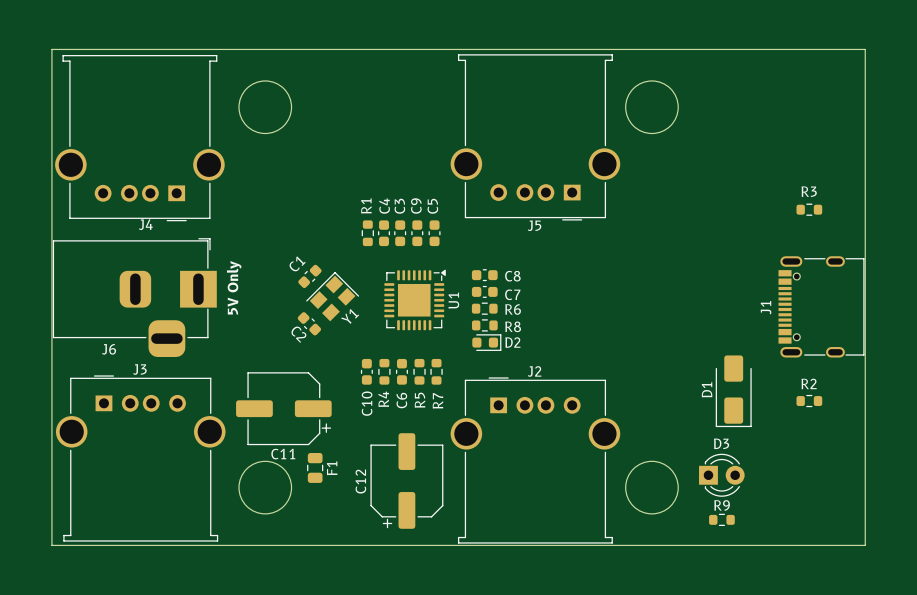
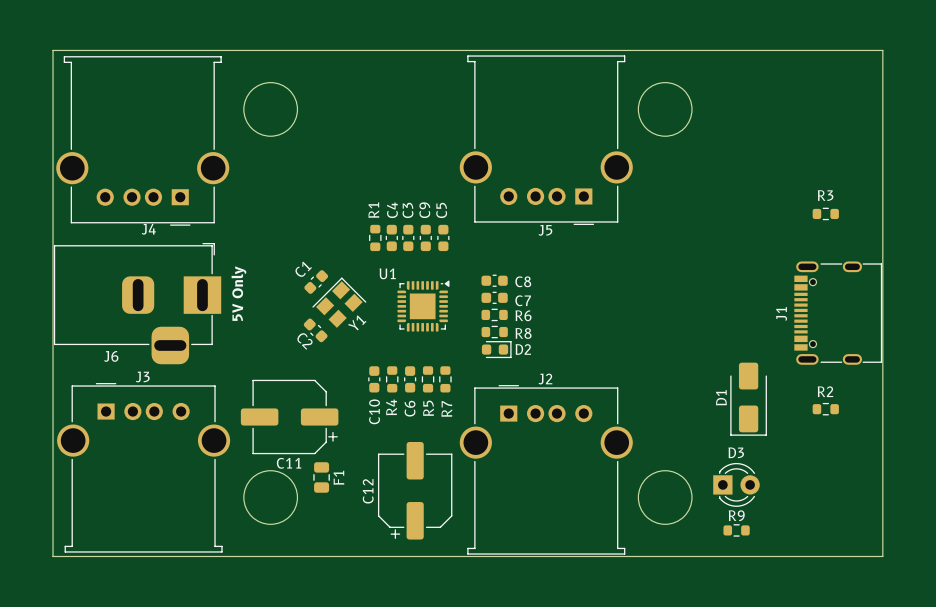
U1 footprint: [384, 269, 446, 331] -> [397, 280, 450, 332]
U1 name rotation: 0° (453, 300) -> 90° clockwise (387, 273)
U1 name position: U1 (453, 300) -> U1 (387, 273)

